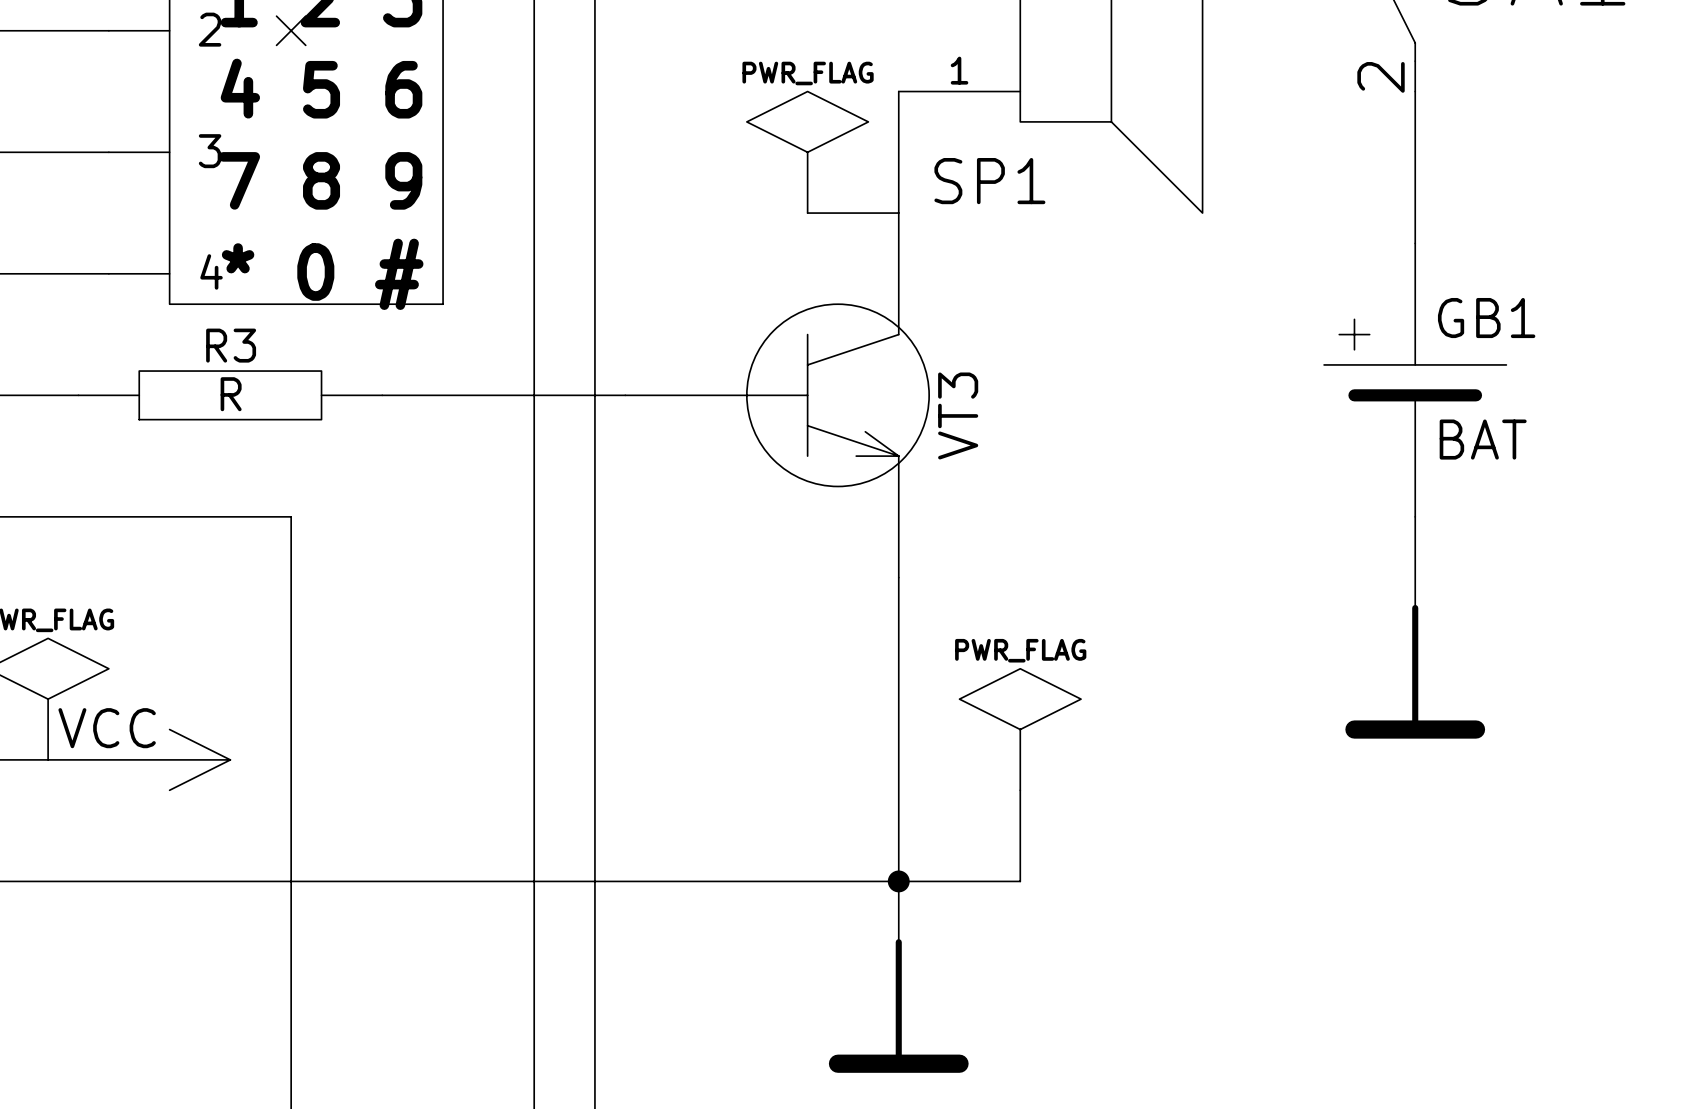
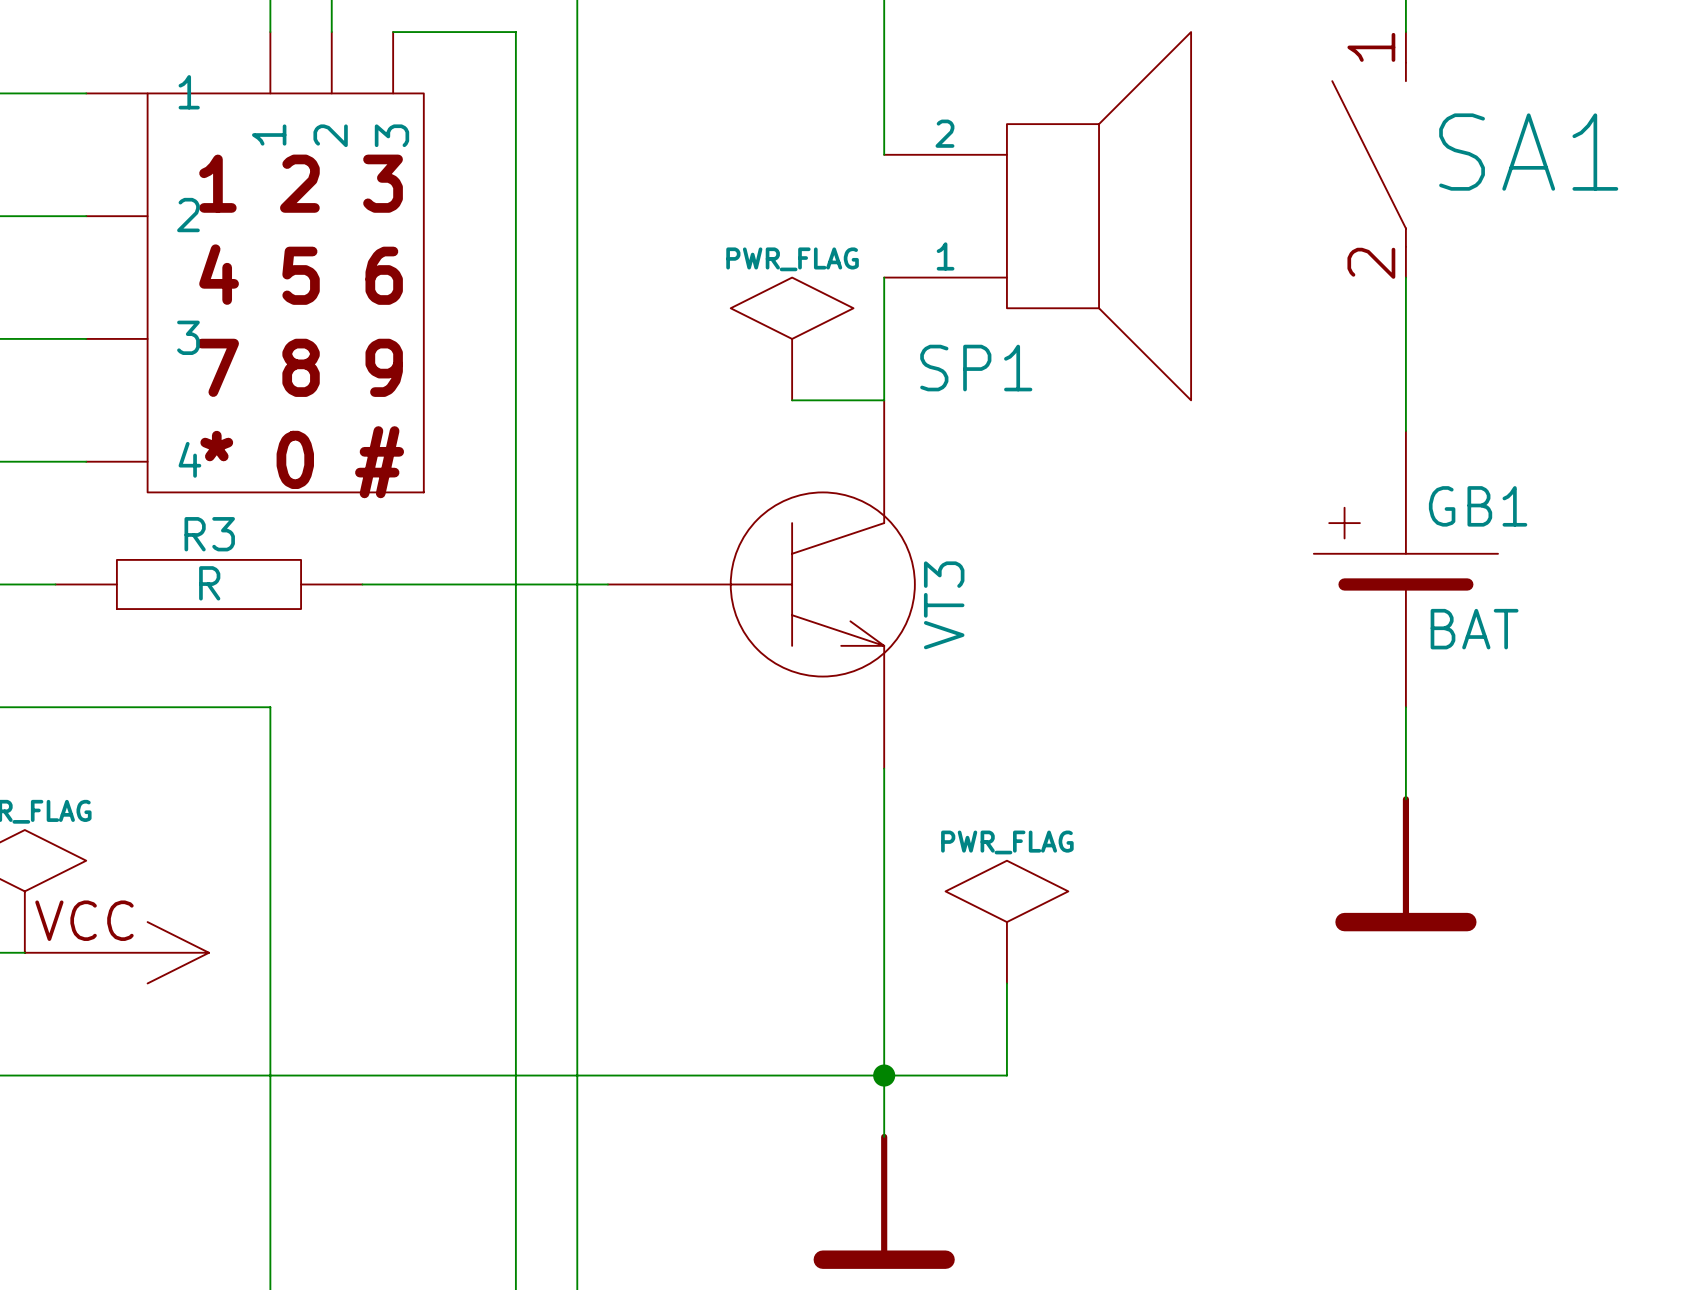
no-connect mark: (291, 30) -> none

